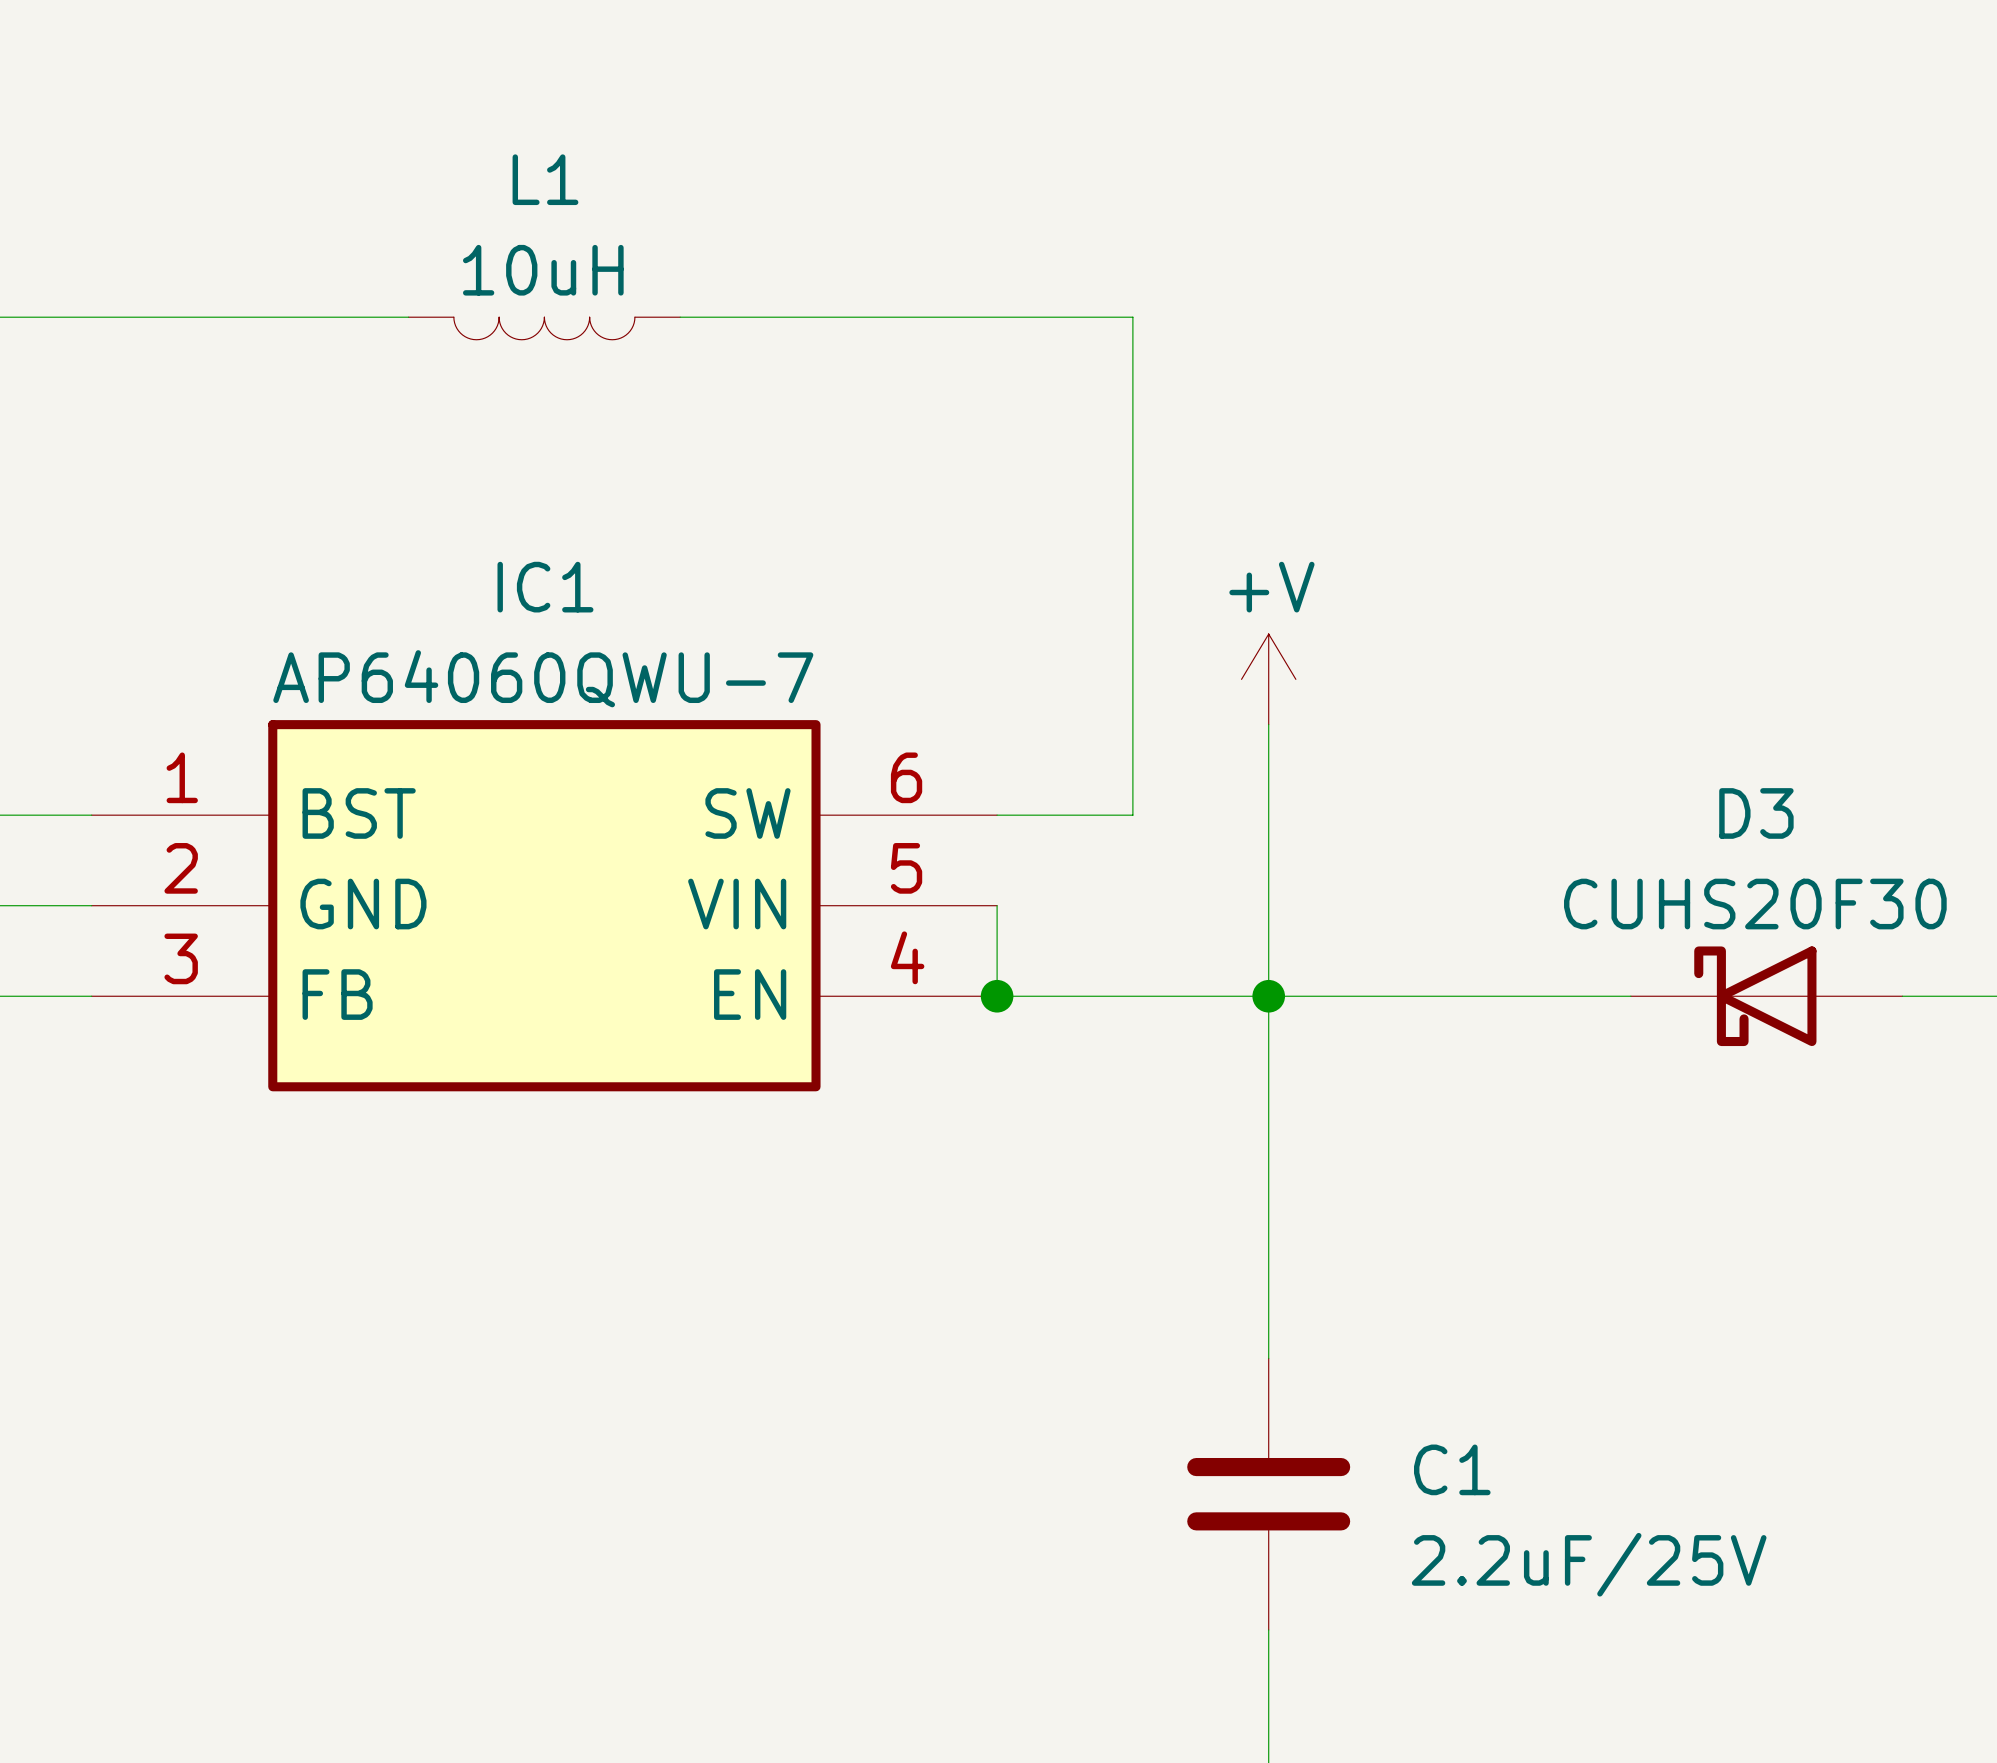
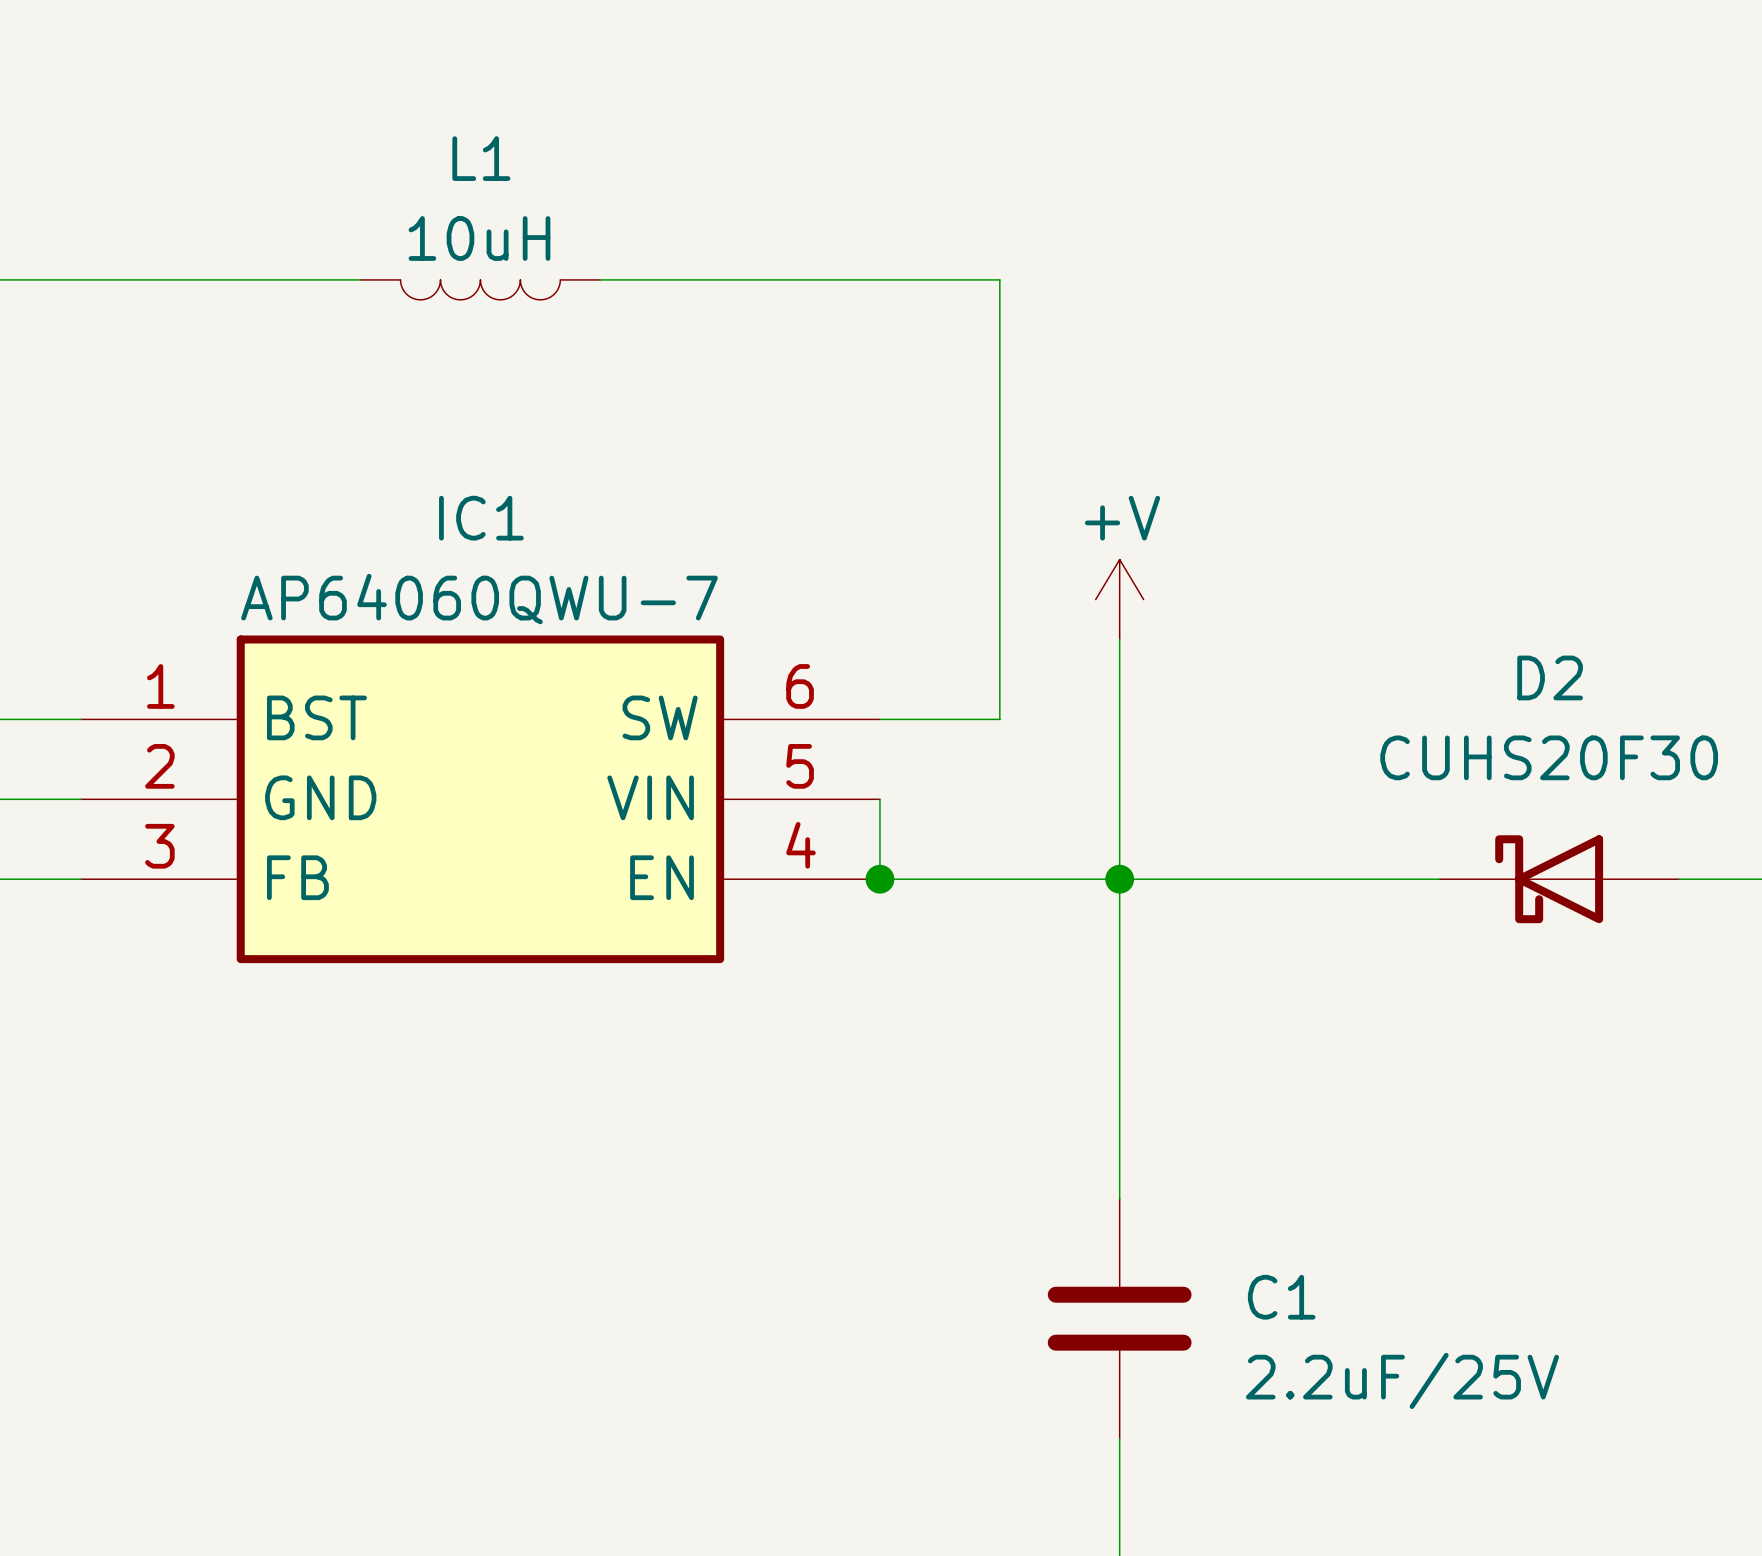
D3 name: D3 (1756, 813) -> D2 (1550, 677)
D3 value position: CUHS20F30 (1755, 904) -> CUHS20F30 (1549, 757)

